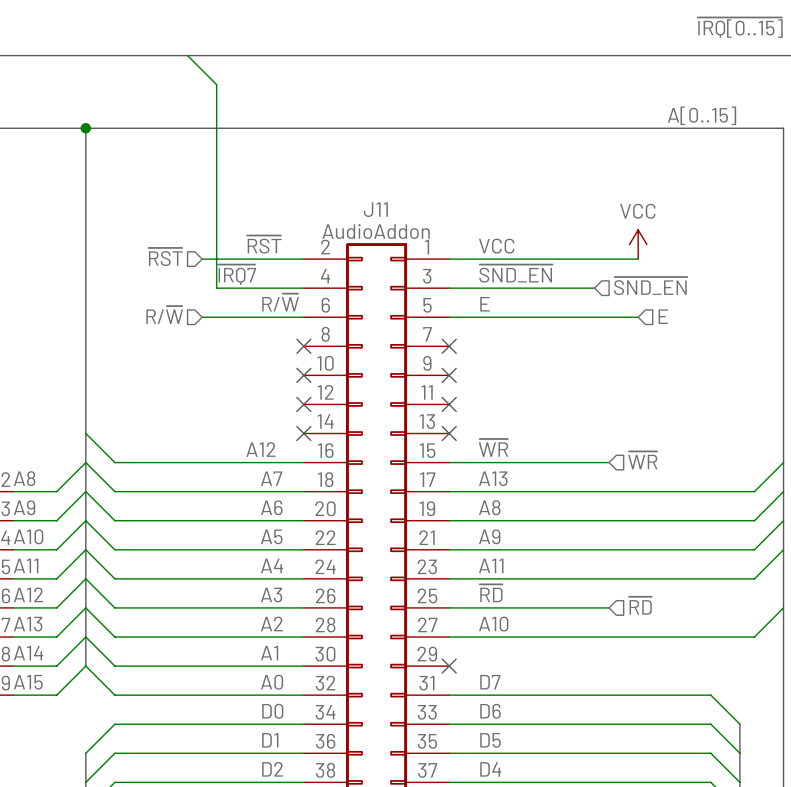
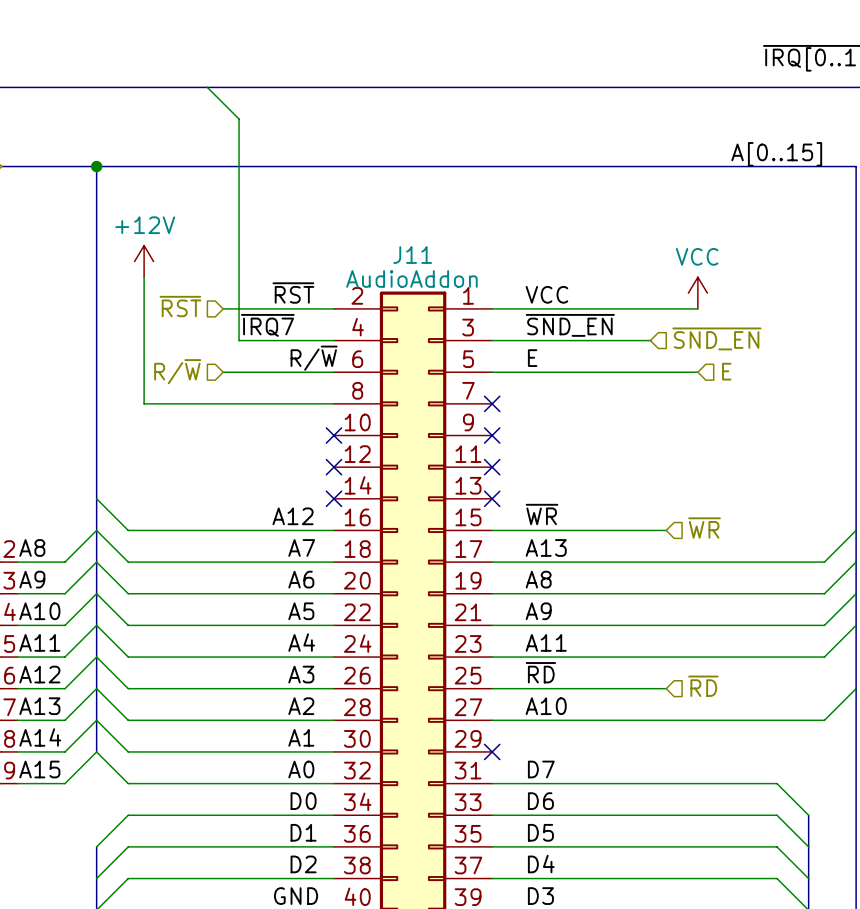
power symbol: none -> +12V (144, 261)
wire: none -> (144, 277) (144, 403) (333, 403)
no-connect mark: (303, 346) -> none

